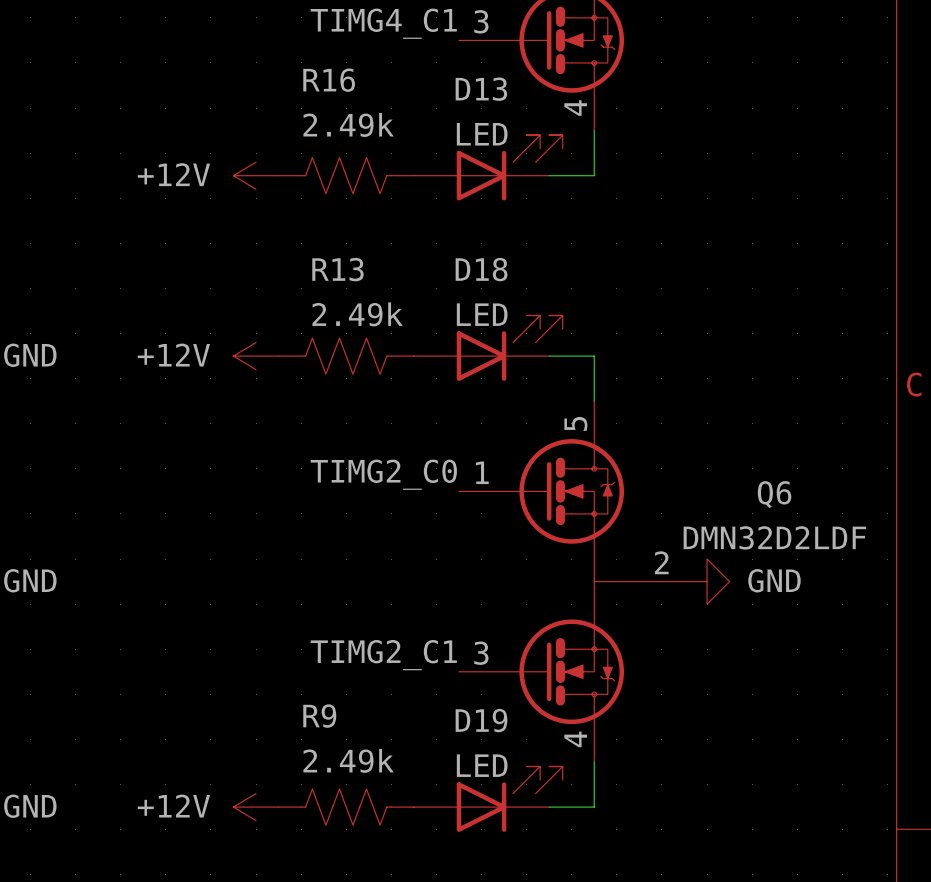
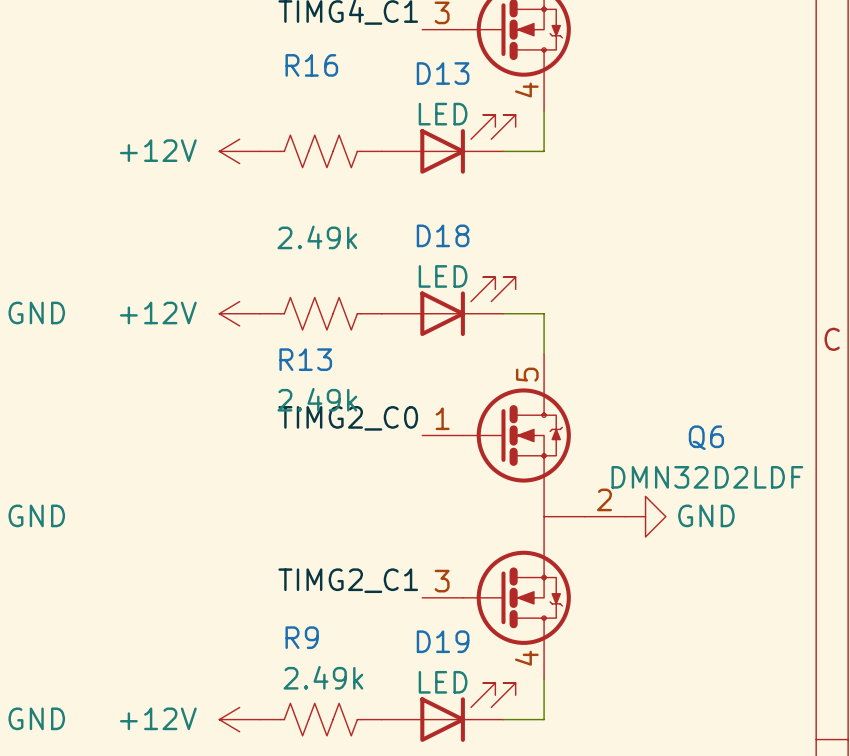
R16 value position: 2.49k (348, 124) -> 2.49k (317, 237)
R13 name position: R13 (337, 269) -> R13 (305, 359)
R13 value position: 2.49k (357, 314) -> 2.49k (317, 399)

